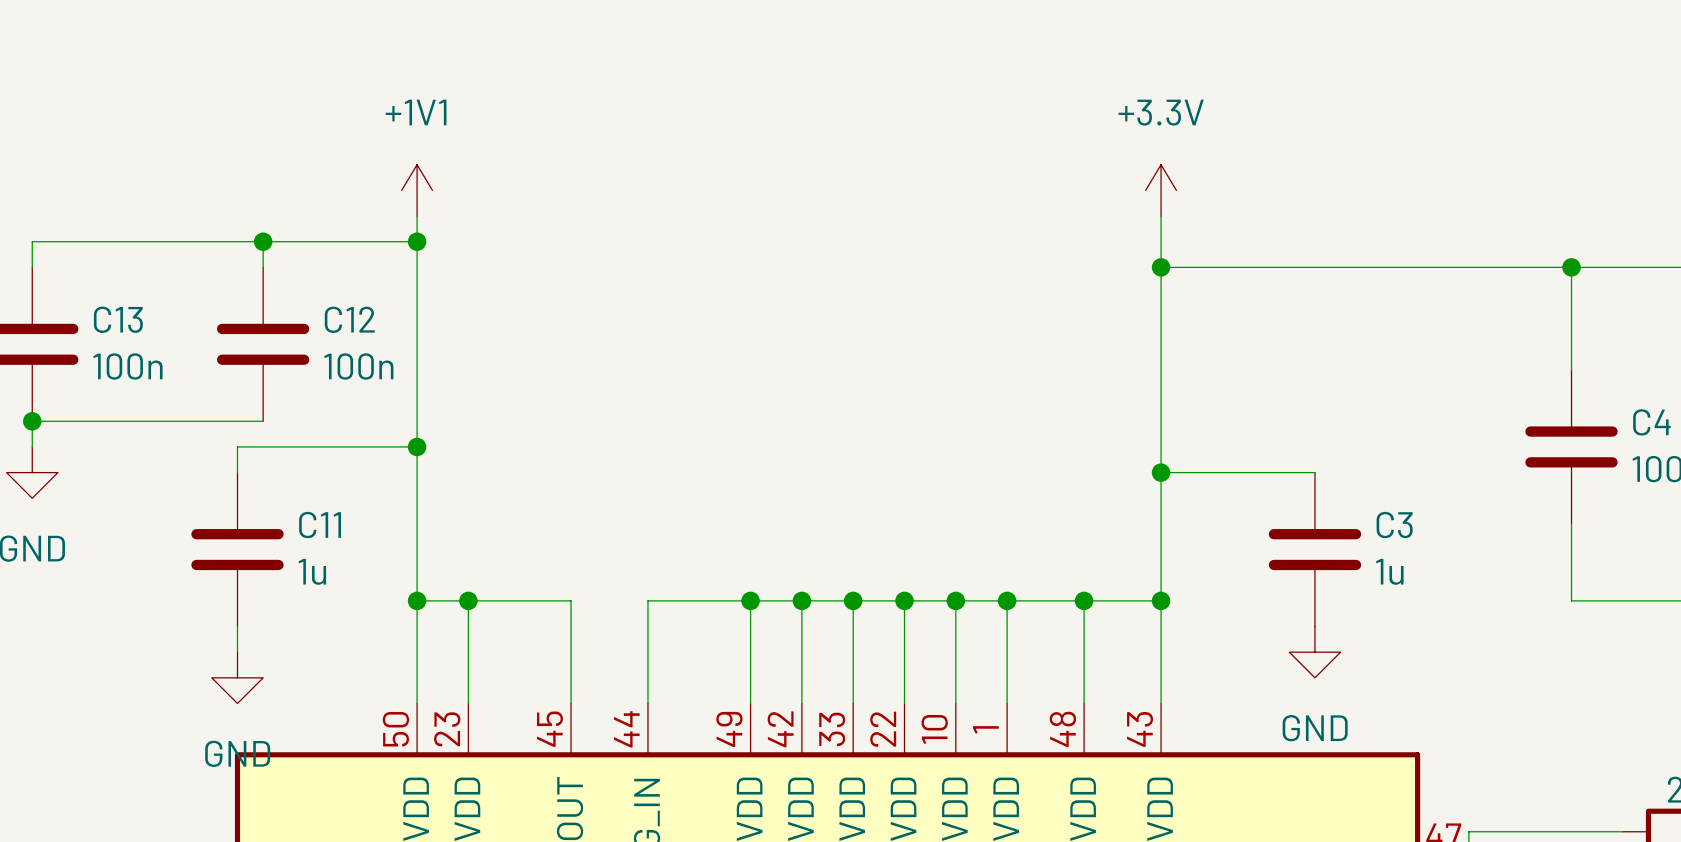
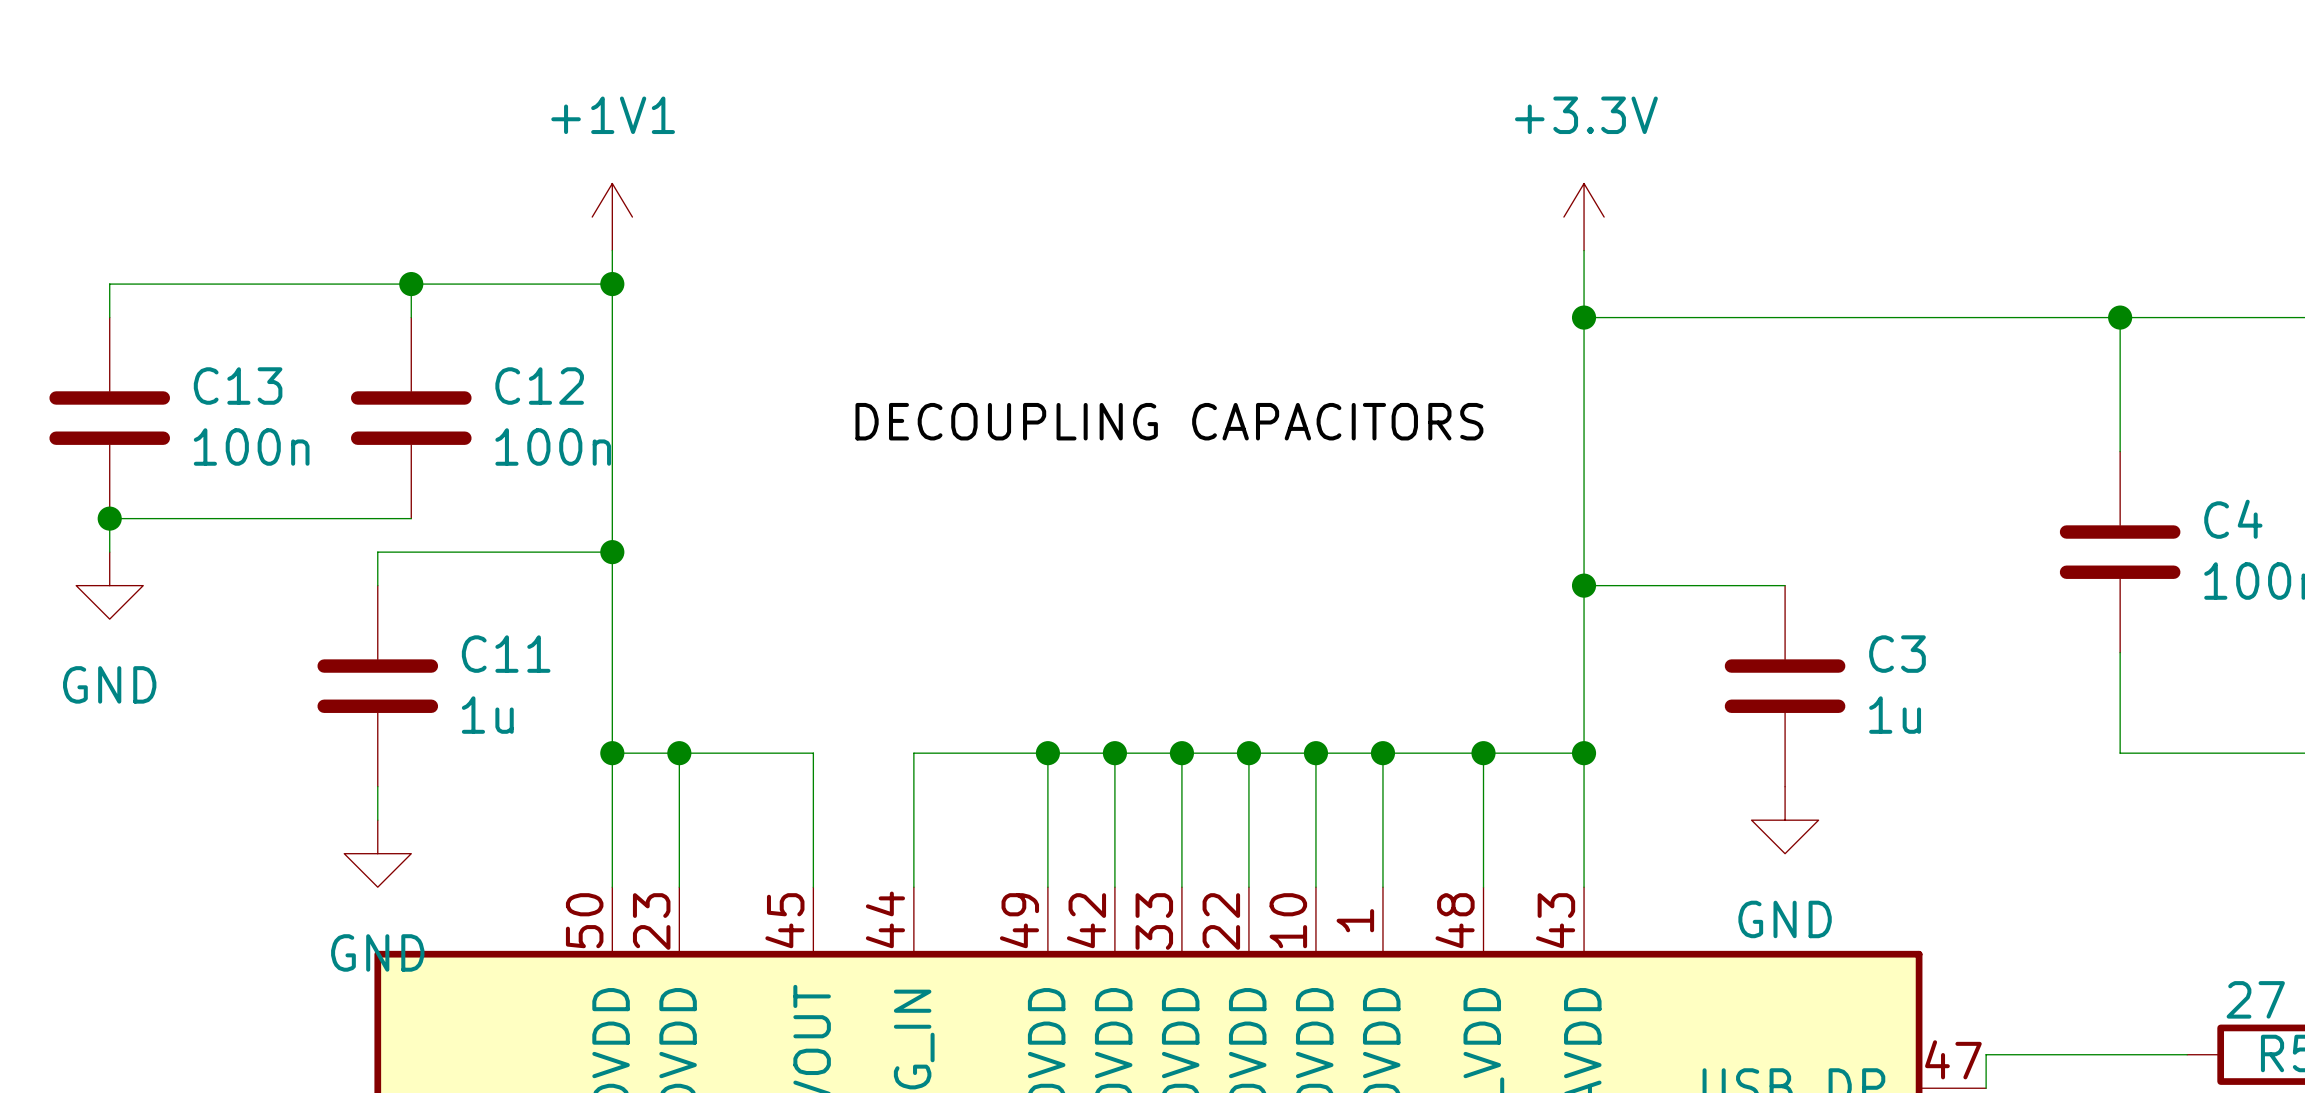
label: none -> DECOUPLING CAPACITORS (1169, 421)

